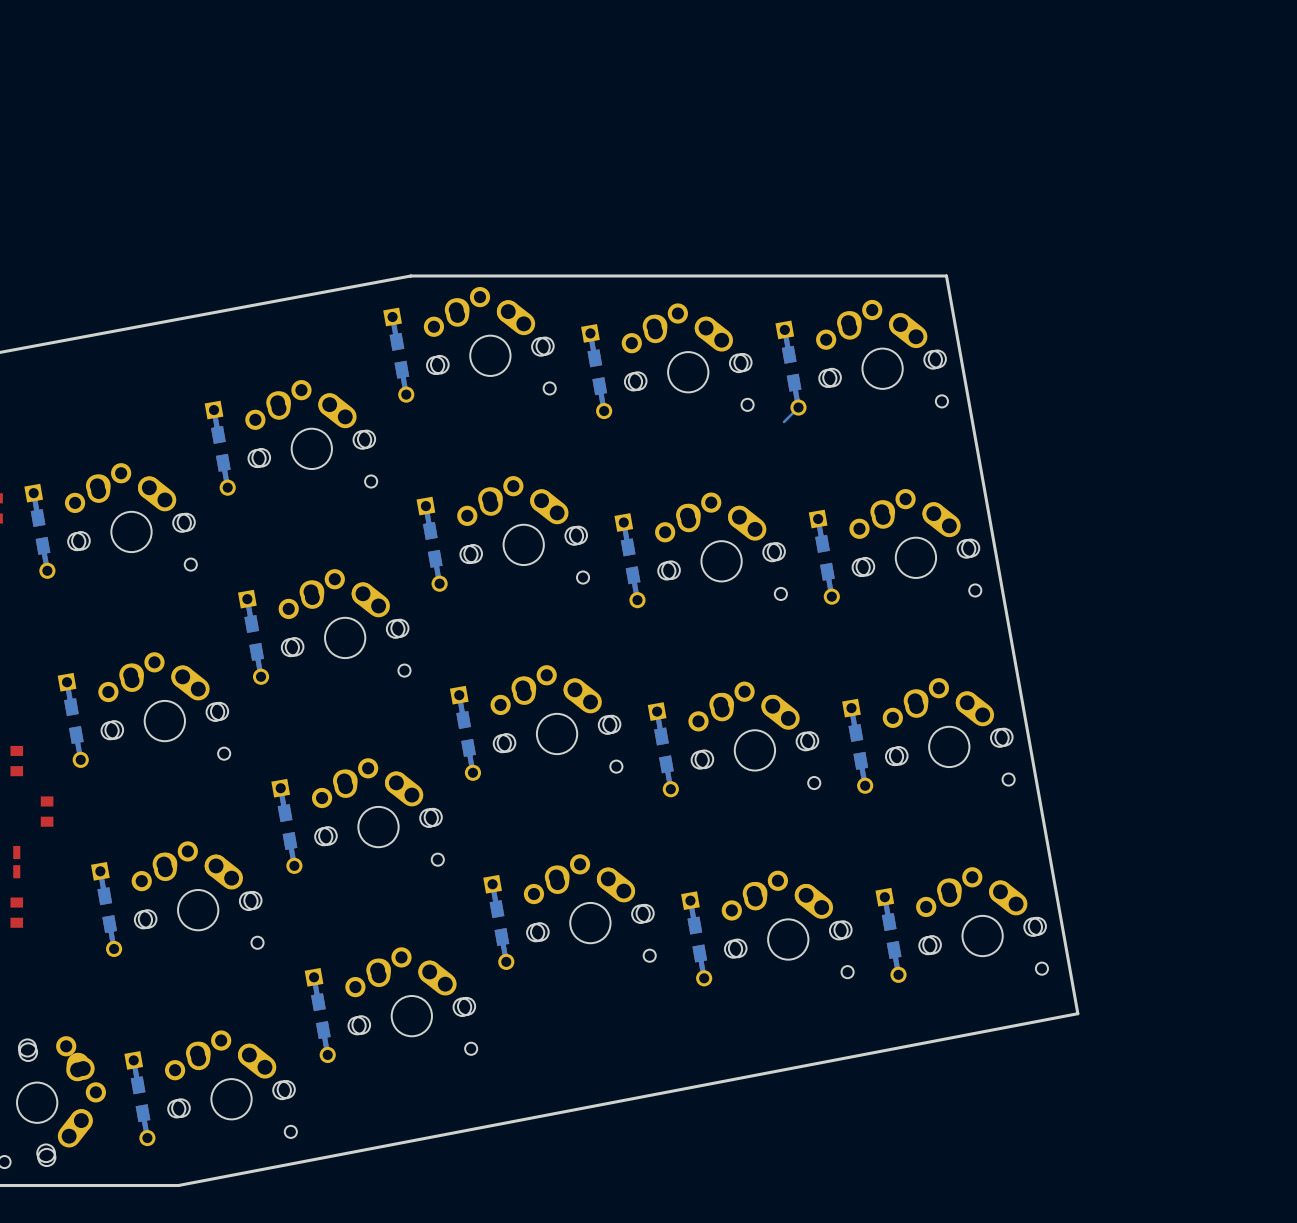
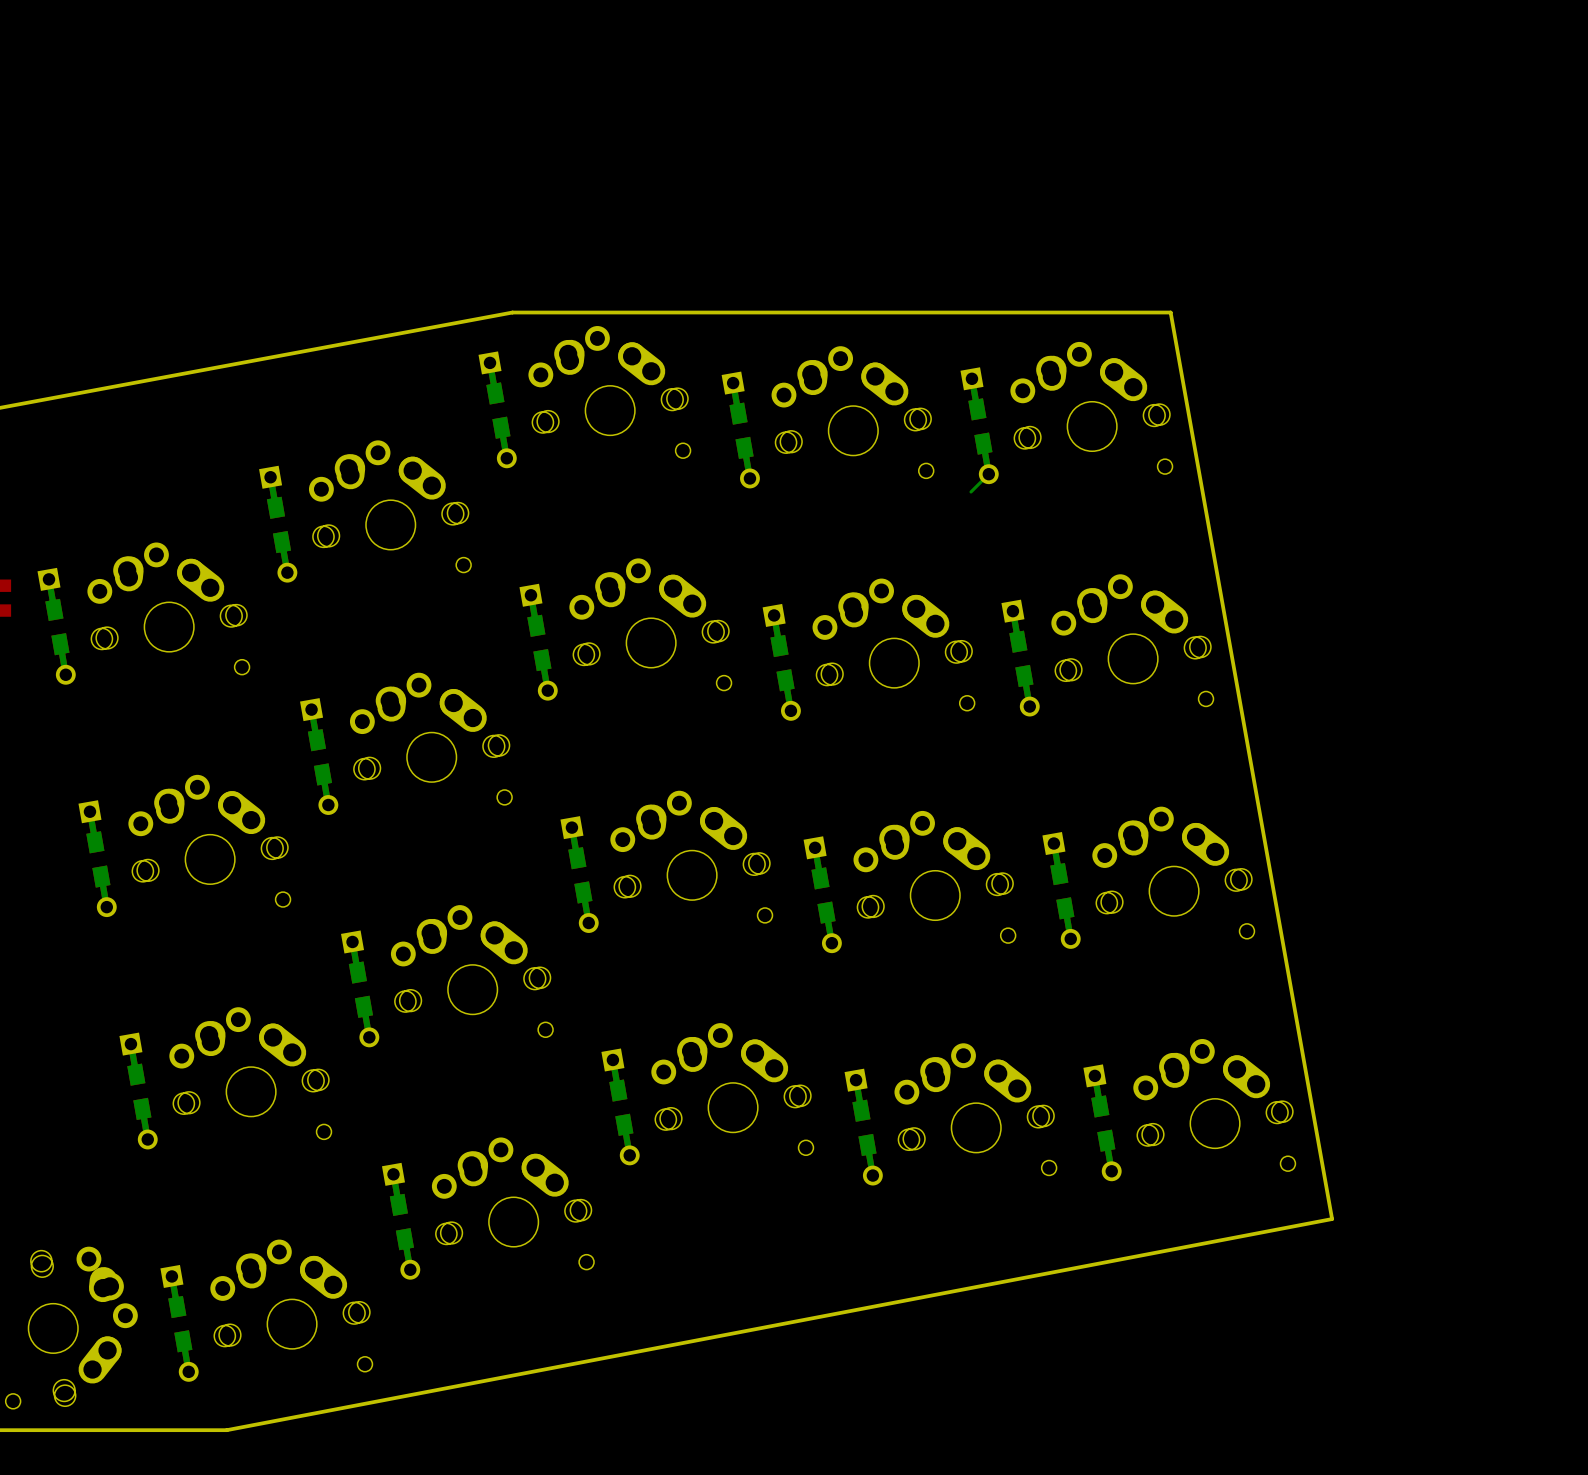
part: (16, 761) -> none
part: (47, 811) -> none
part: (16, 862) -> none
part: (16, 912) -> none

